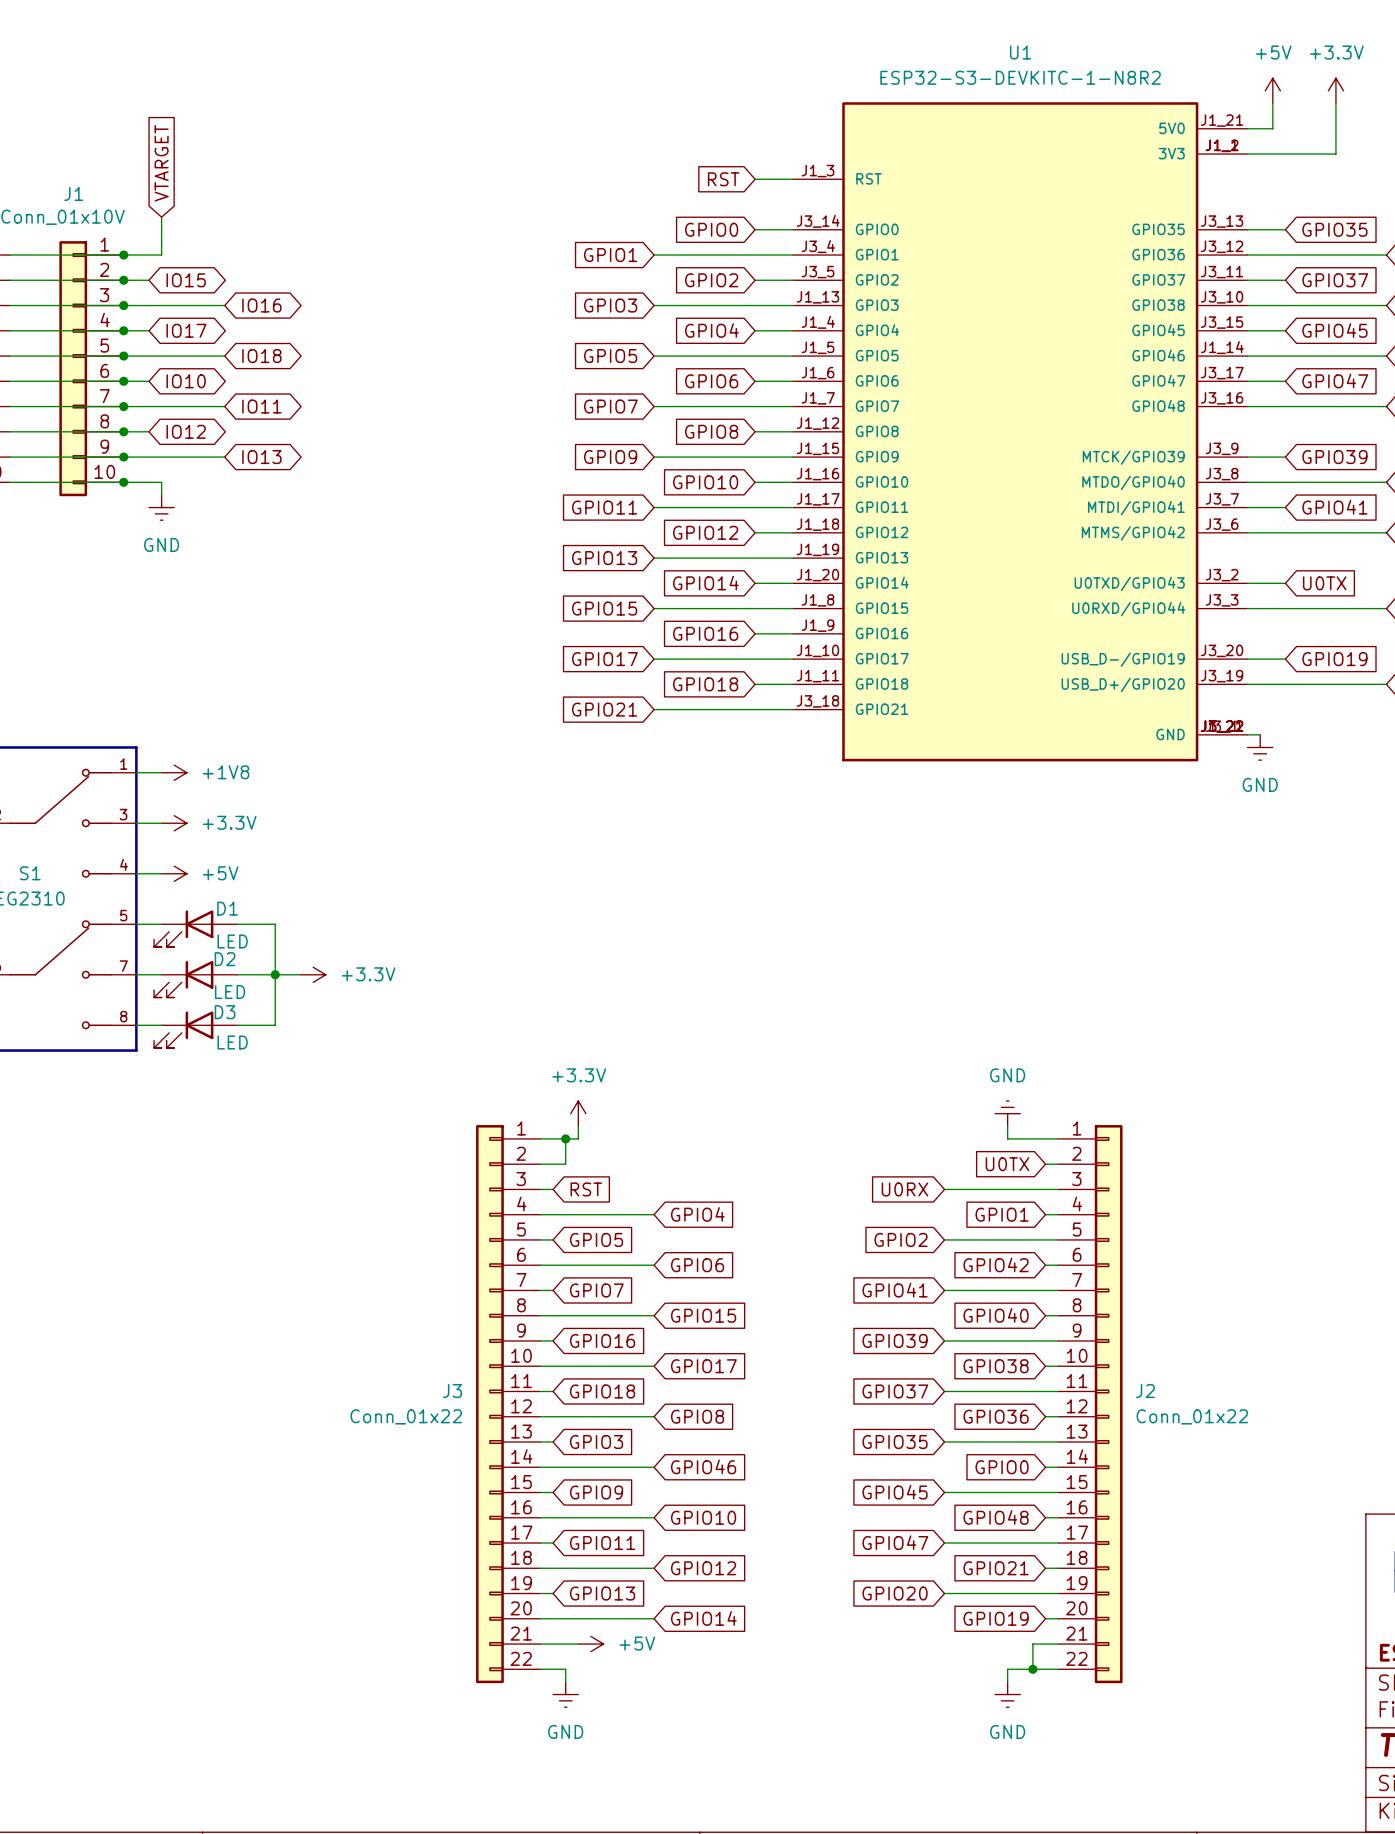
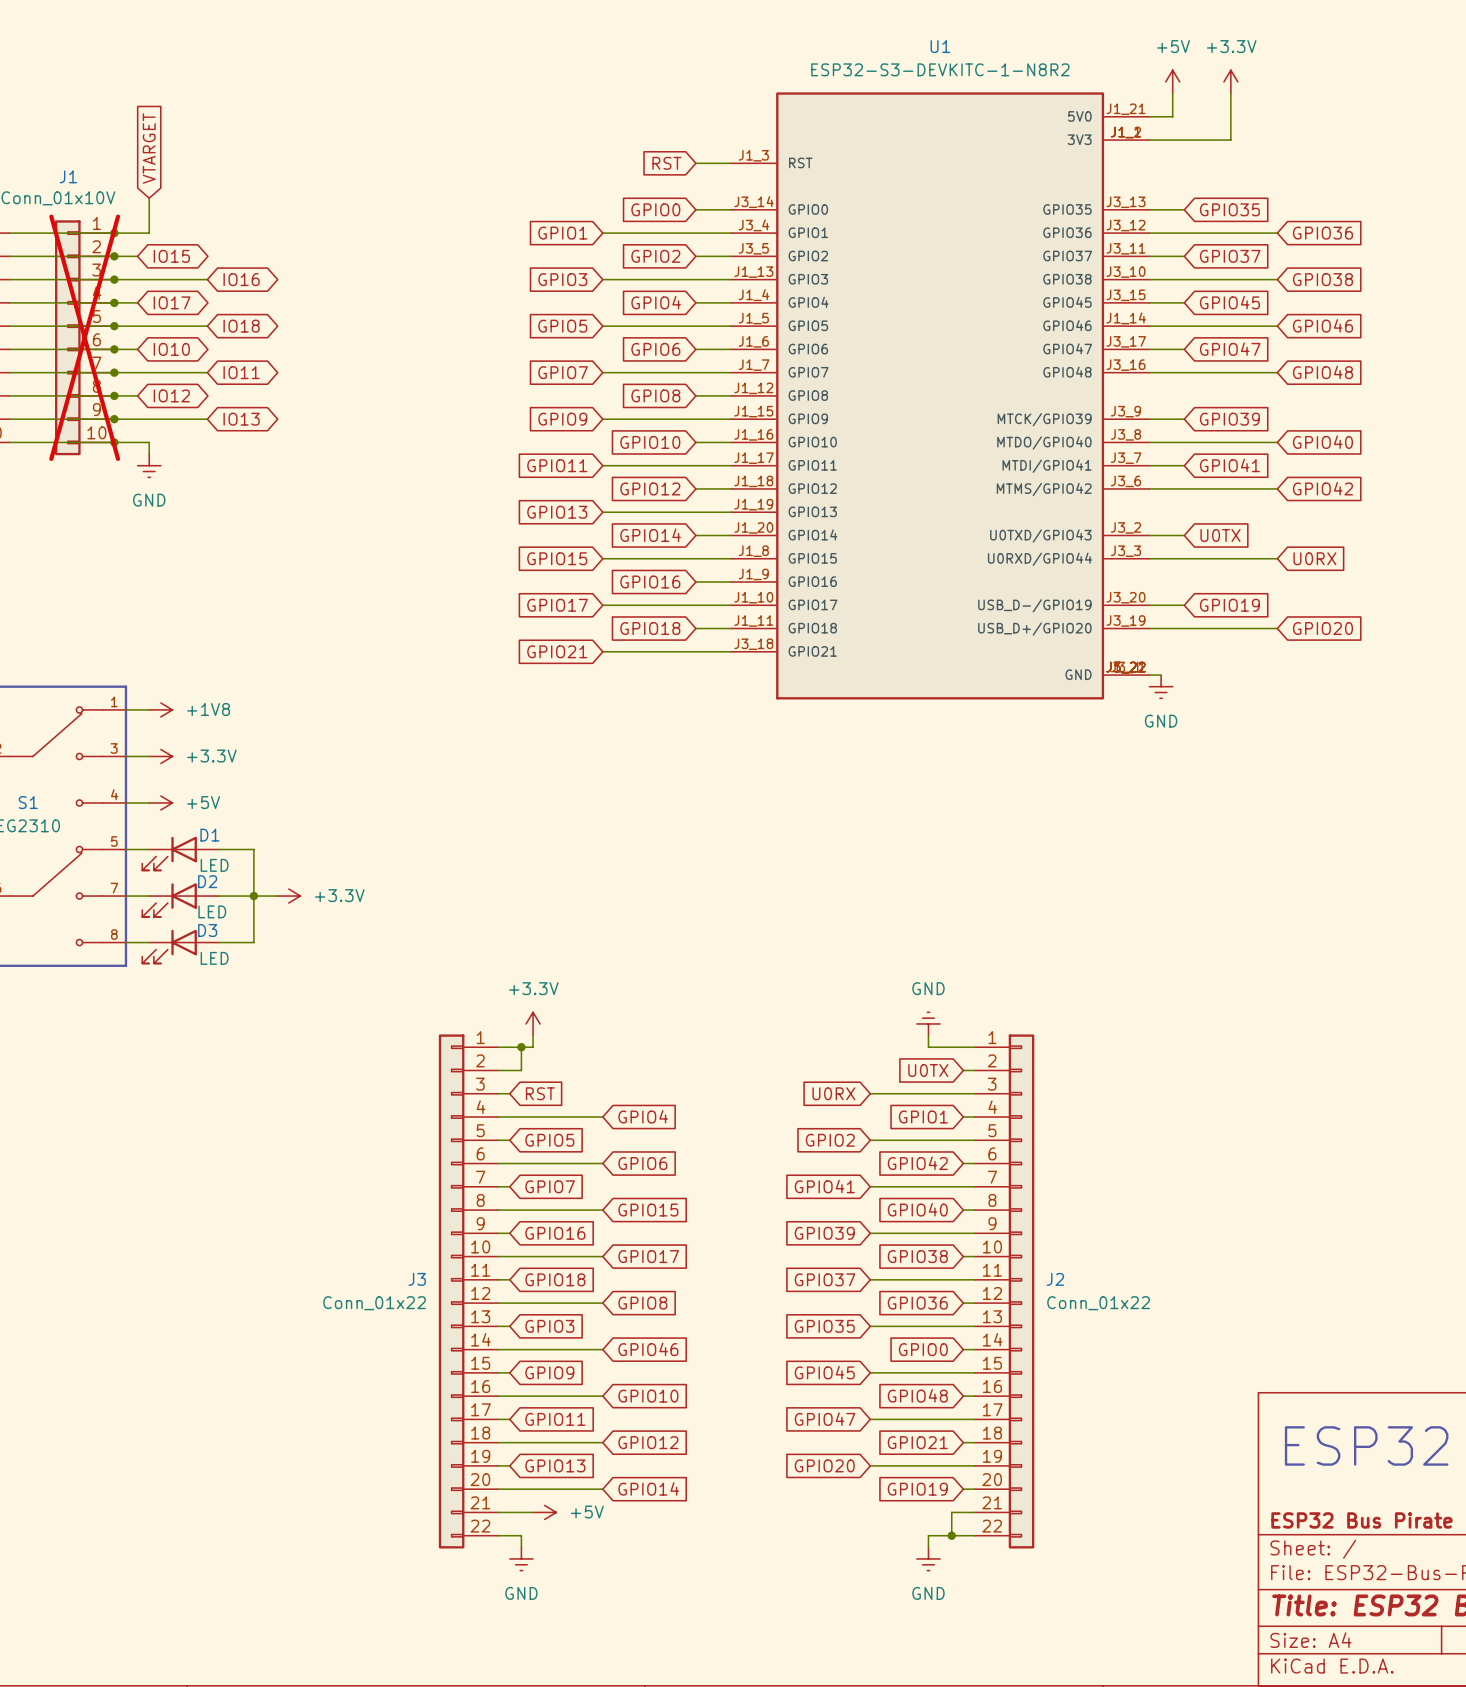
J1 do-not-place cross: none -> (84, 337)

